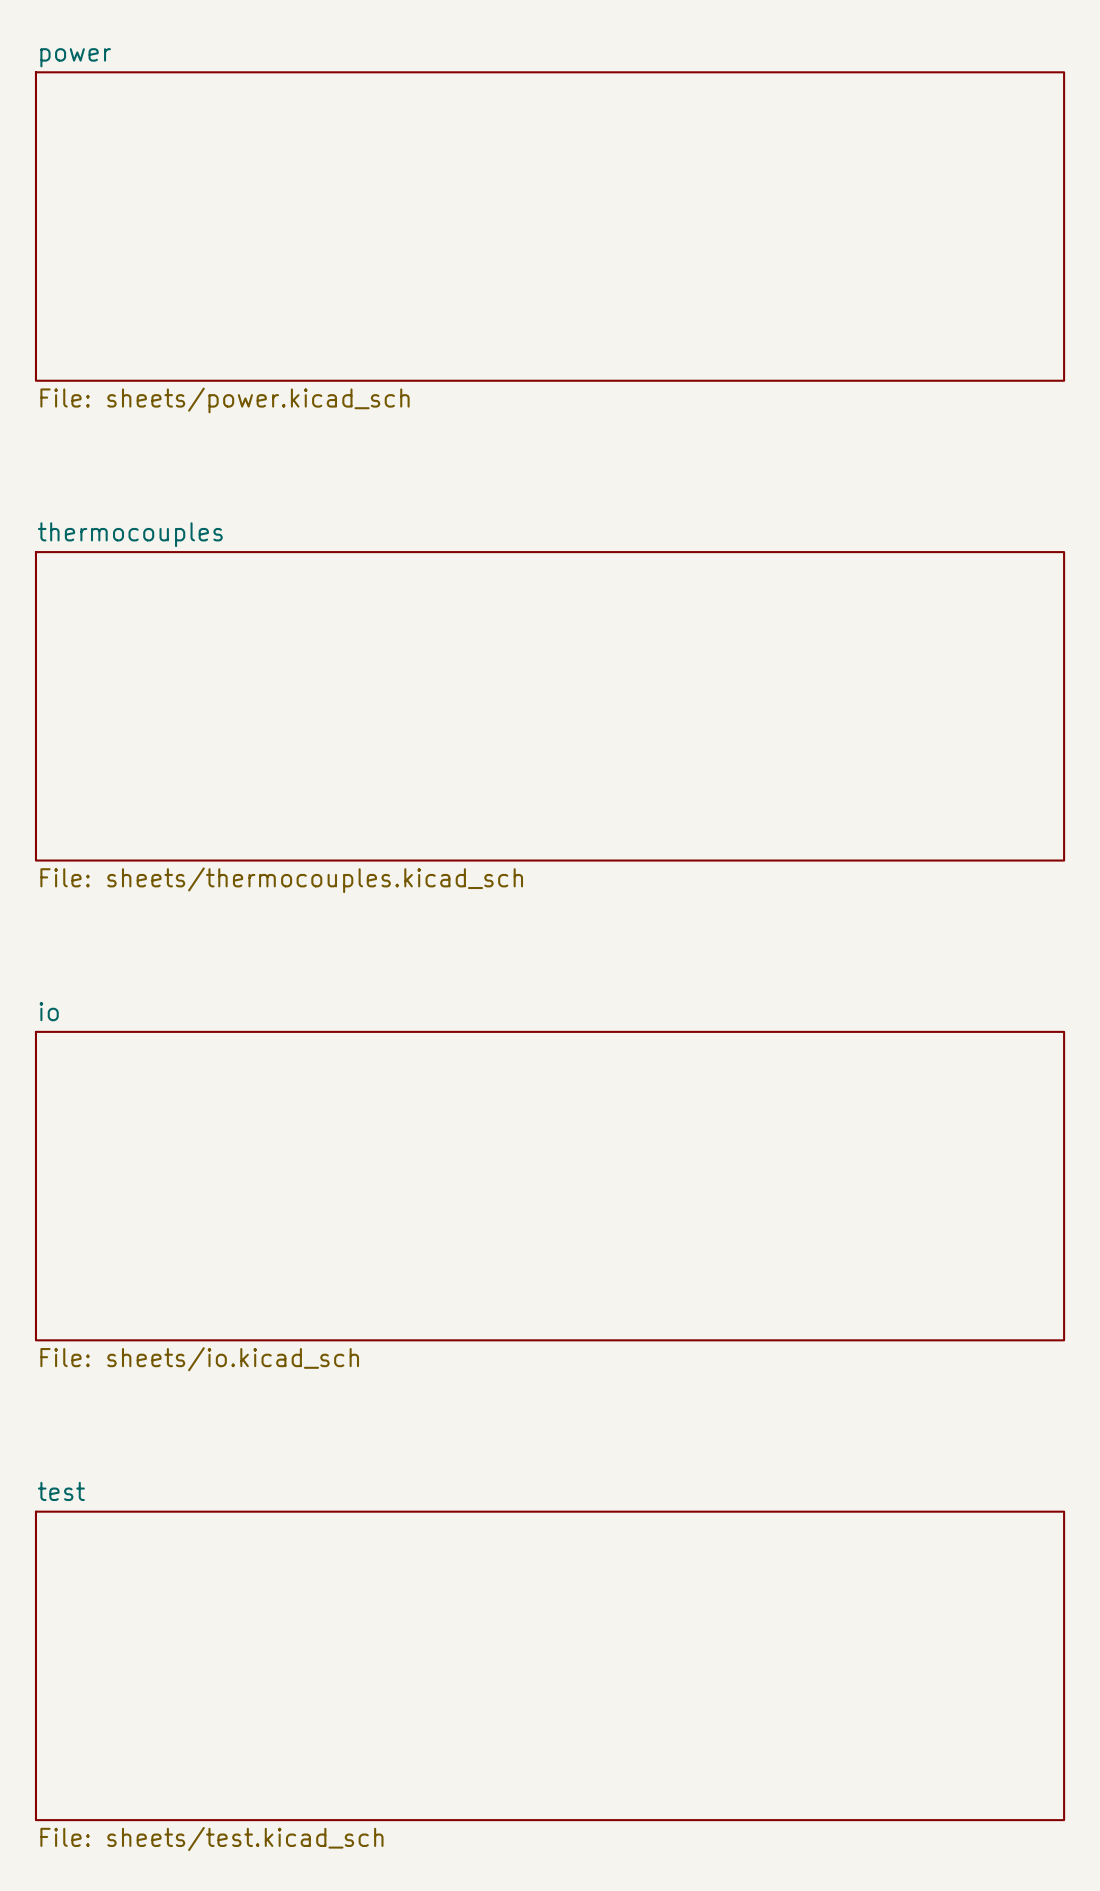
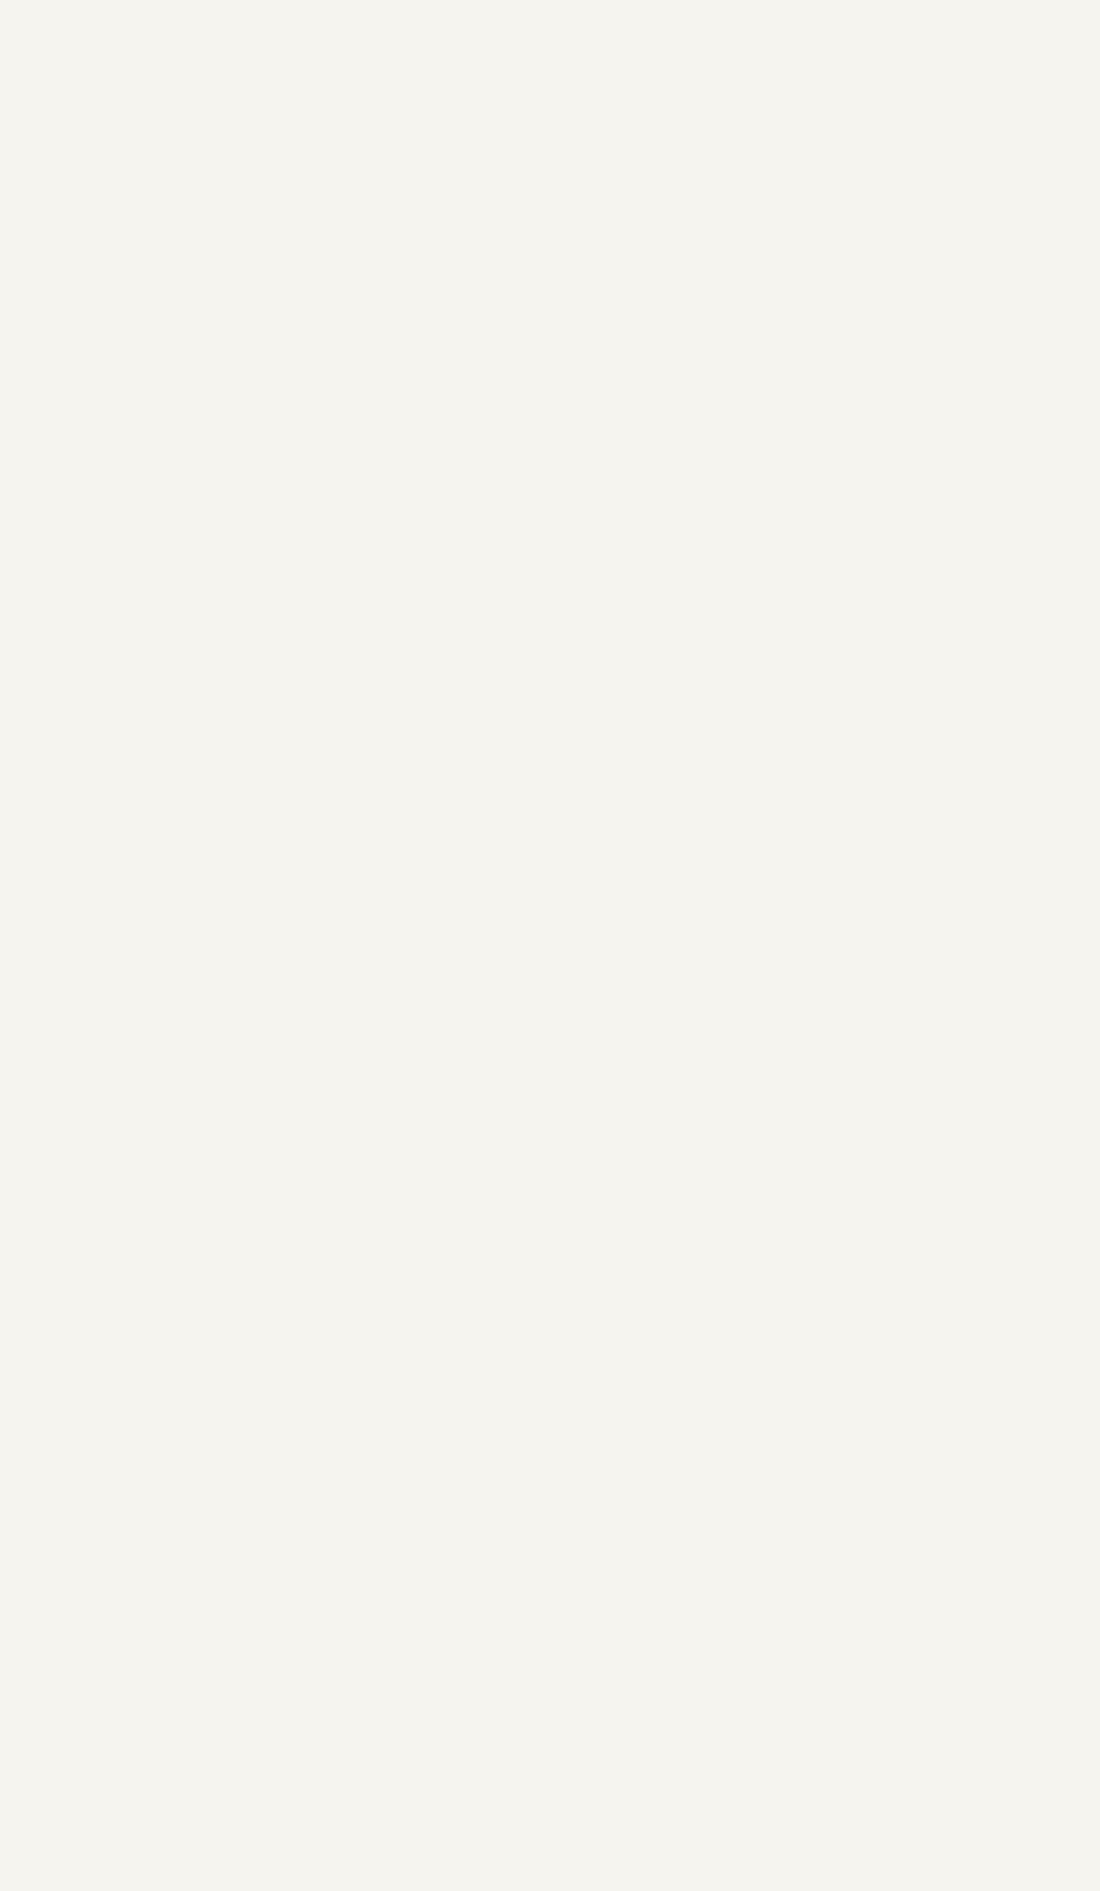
sheet power: File: sheets/power.kicad_sch (550, 226) -> none
sheet thermocouples: File: sheets/thermocouples.kicad_sch (550, 706) -> none
sheet io: File: sheets/io.kicad_sch (550, 1186) -> none
sheet test: File: sheets/test.kicad_sch (550, 1665) -> none

